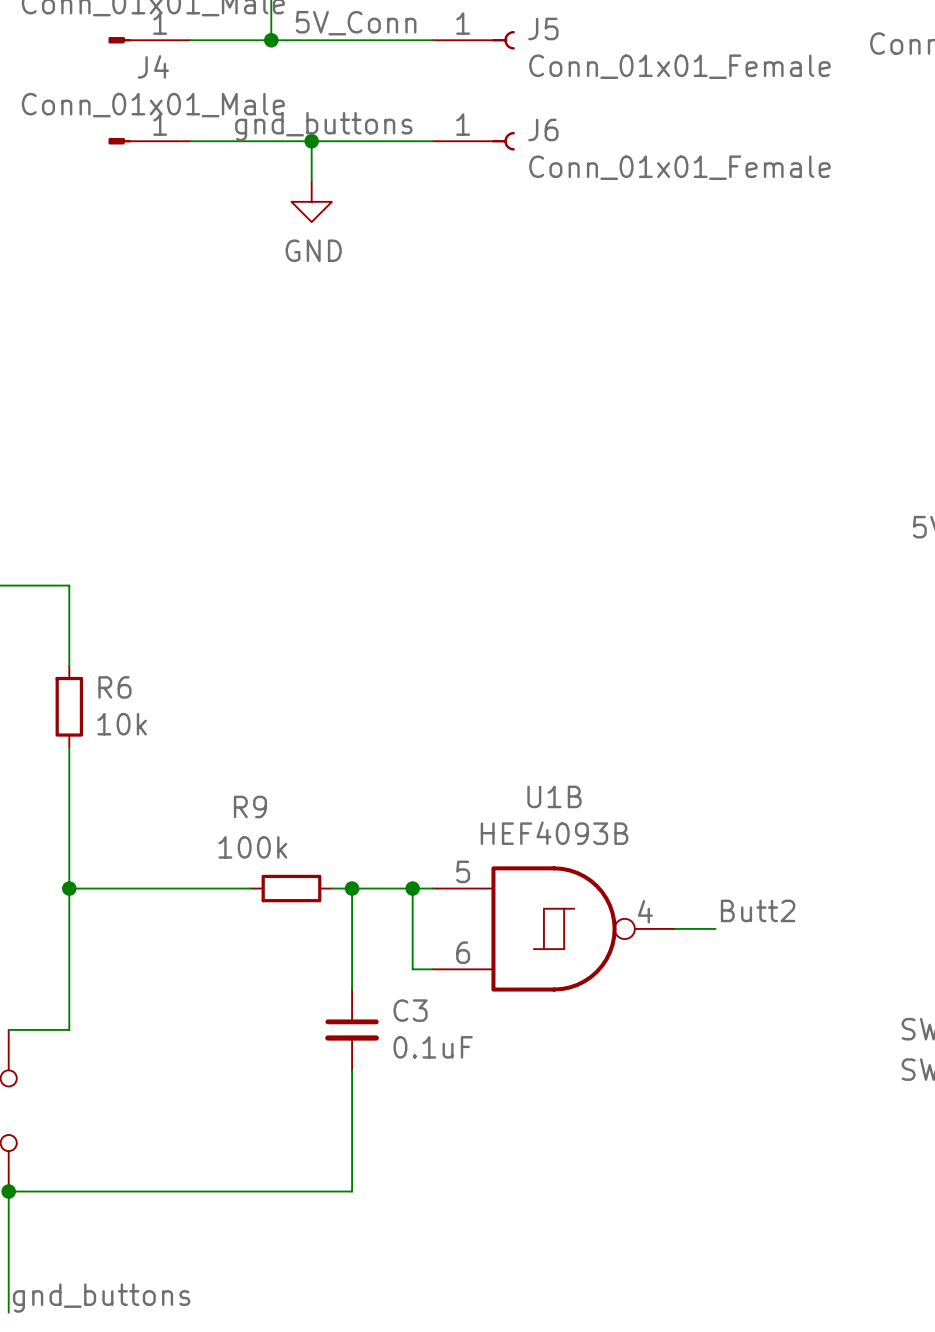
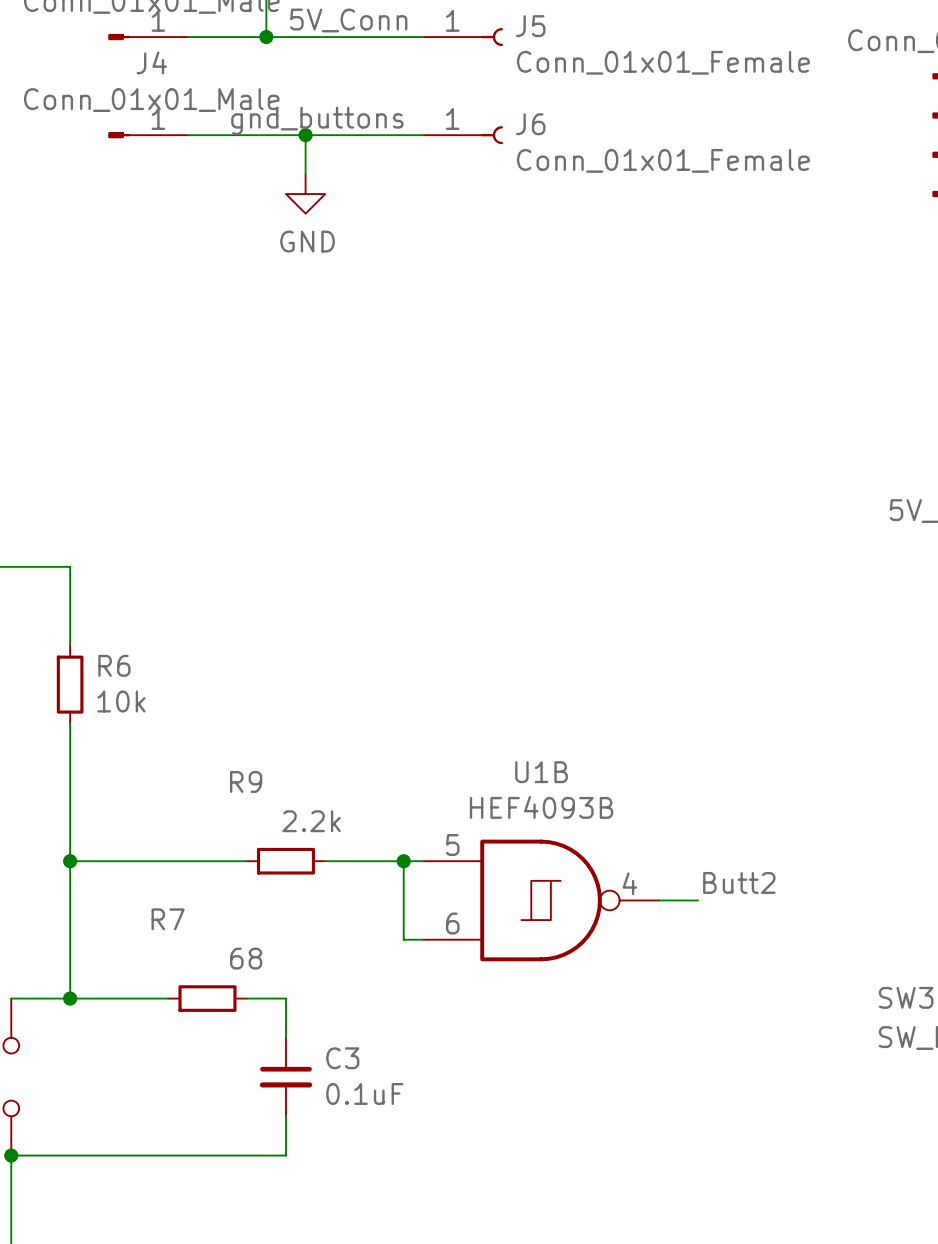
R9 value: 100k (252, 847) -> 2.2k (311, 821)
wire: (352, 888) (352, 989) -> none
junction: (352, 888) -> none
wire: none -> (70, 998) (168, 998)
junction: none -> (70, 998)
R7: none -> 68 (207, 998)
wire: none -> (246, 998) (285, 998) (285, 1037)
C3 position: (352, 1029) -> (285, 1077)
wire: (352, 1070) (352, 1191) (291, 1191) -> (285, 1116) (285, 1155)

